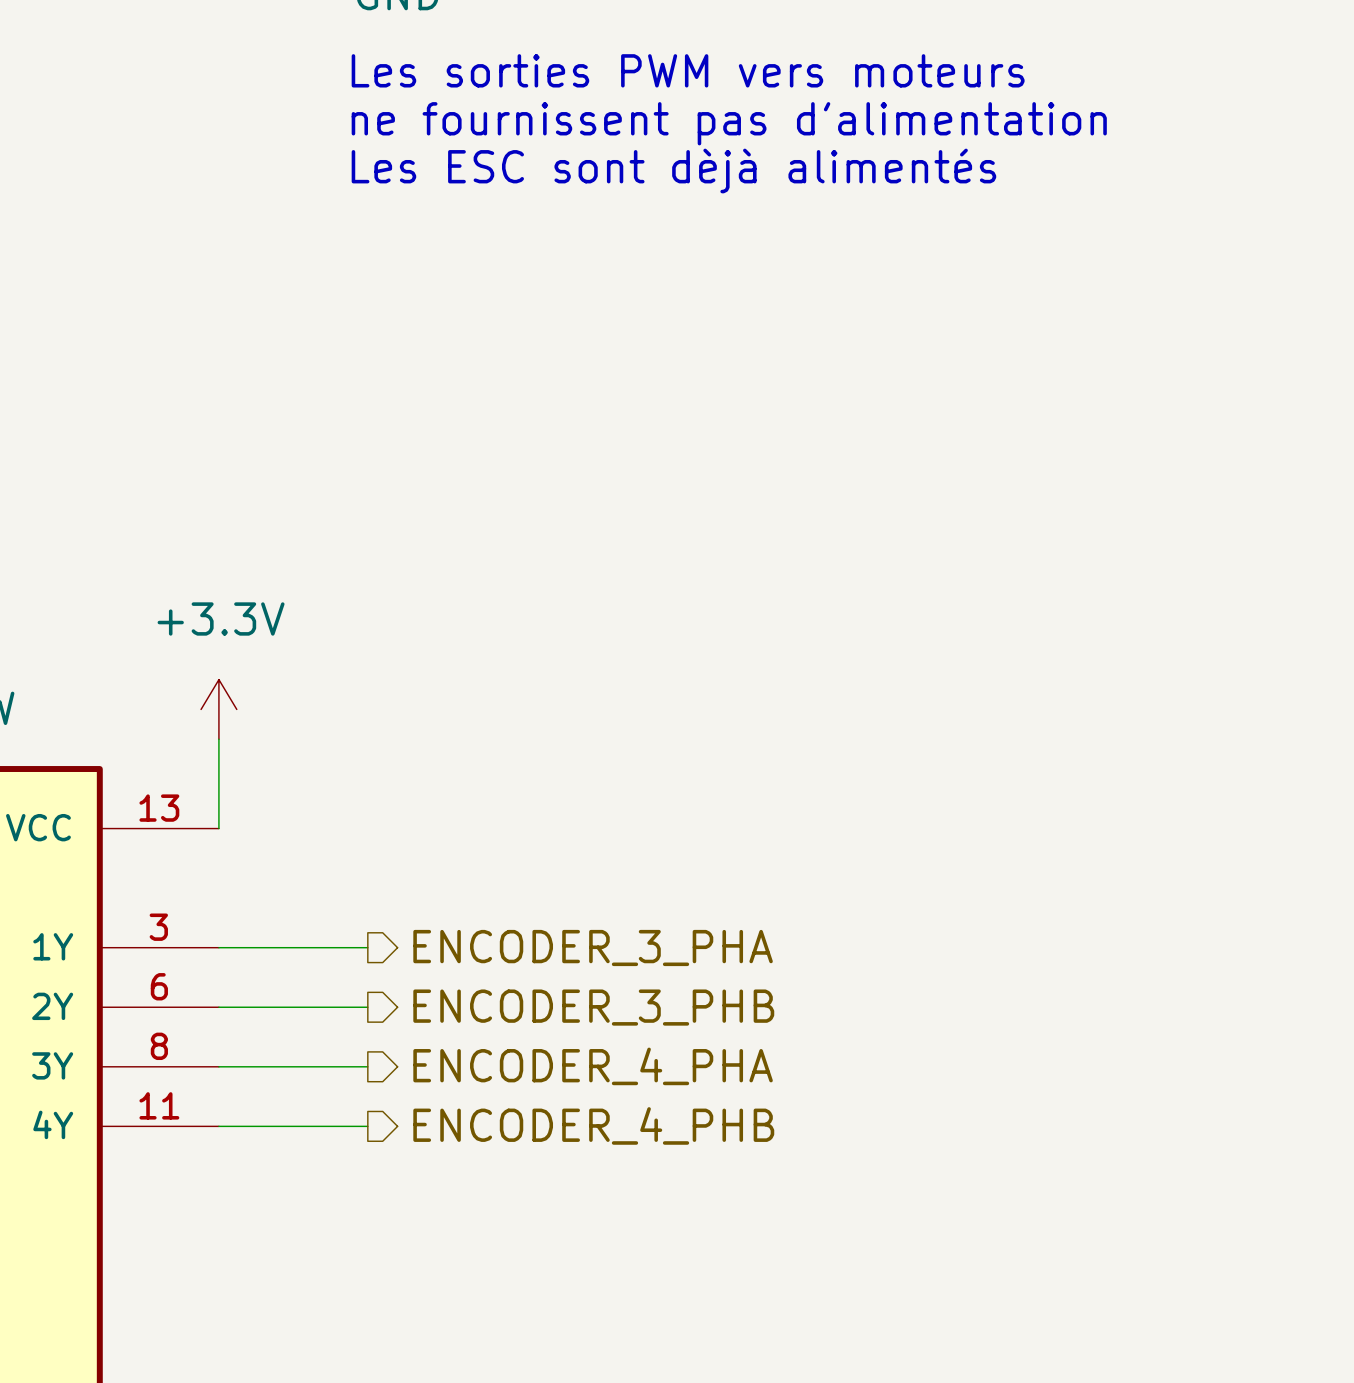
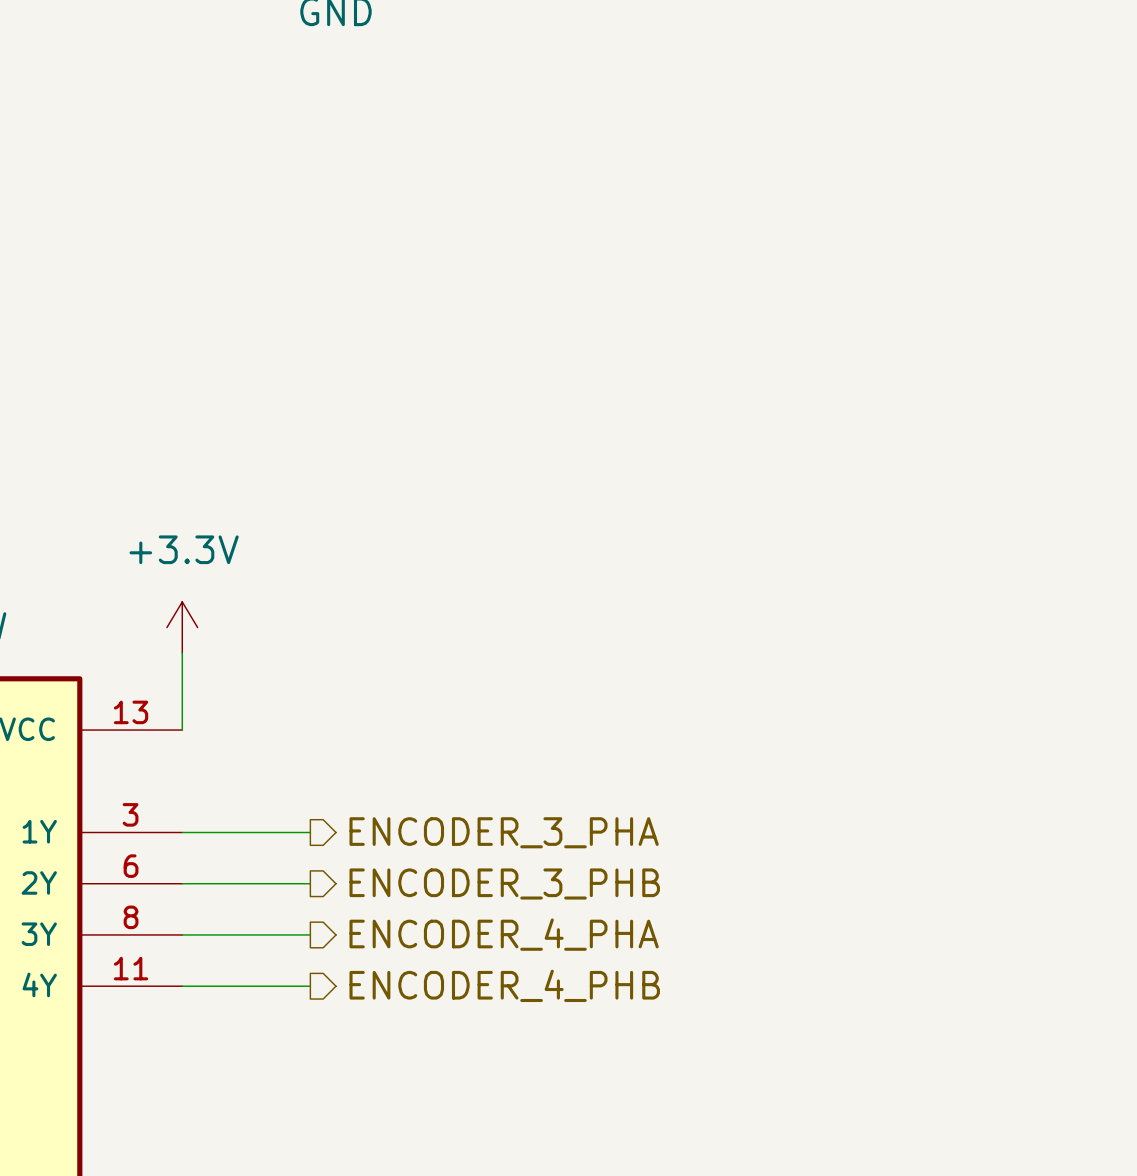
text: Les sorties PWM vers moteurs (688, 70) -> none
text: ne fournissent pas d'alimentation (729, 123) -> none
text: Les ESC sont dèjà alimentés (673, 170) -> none

